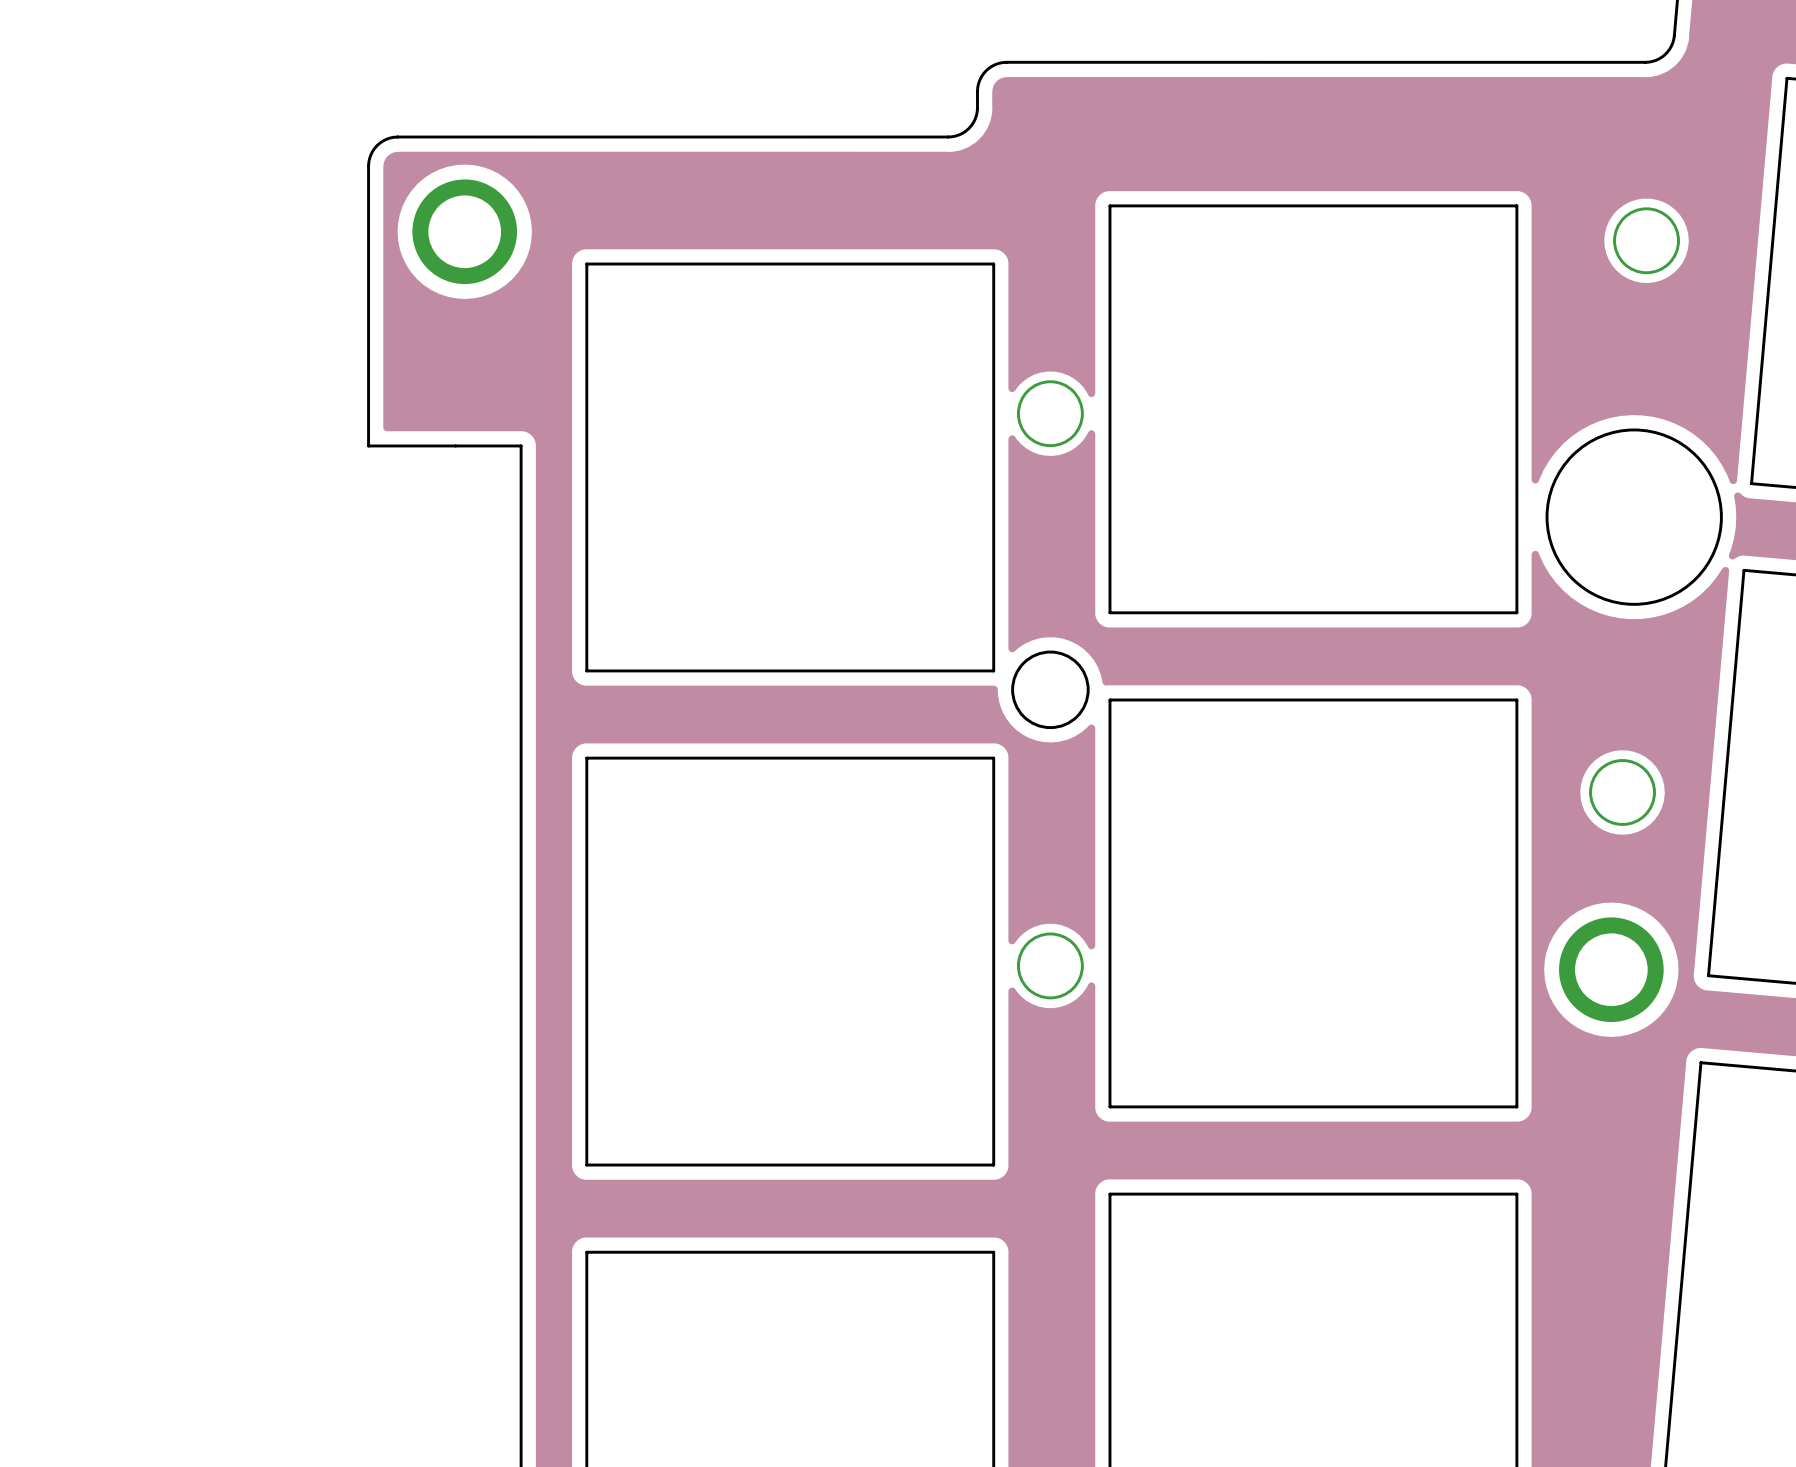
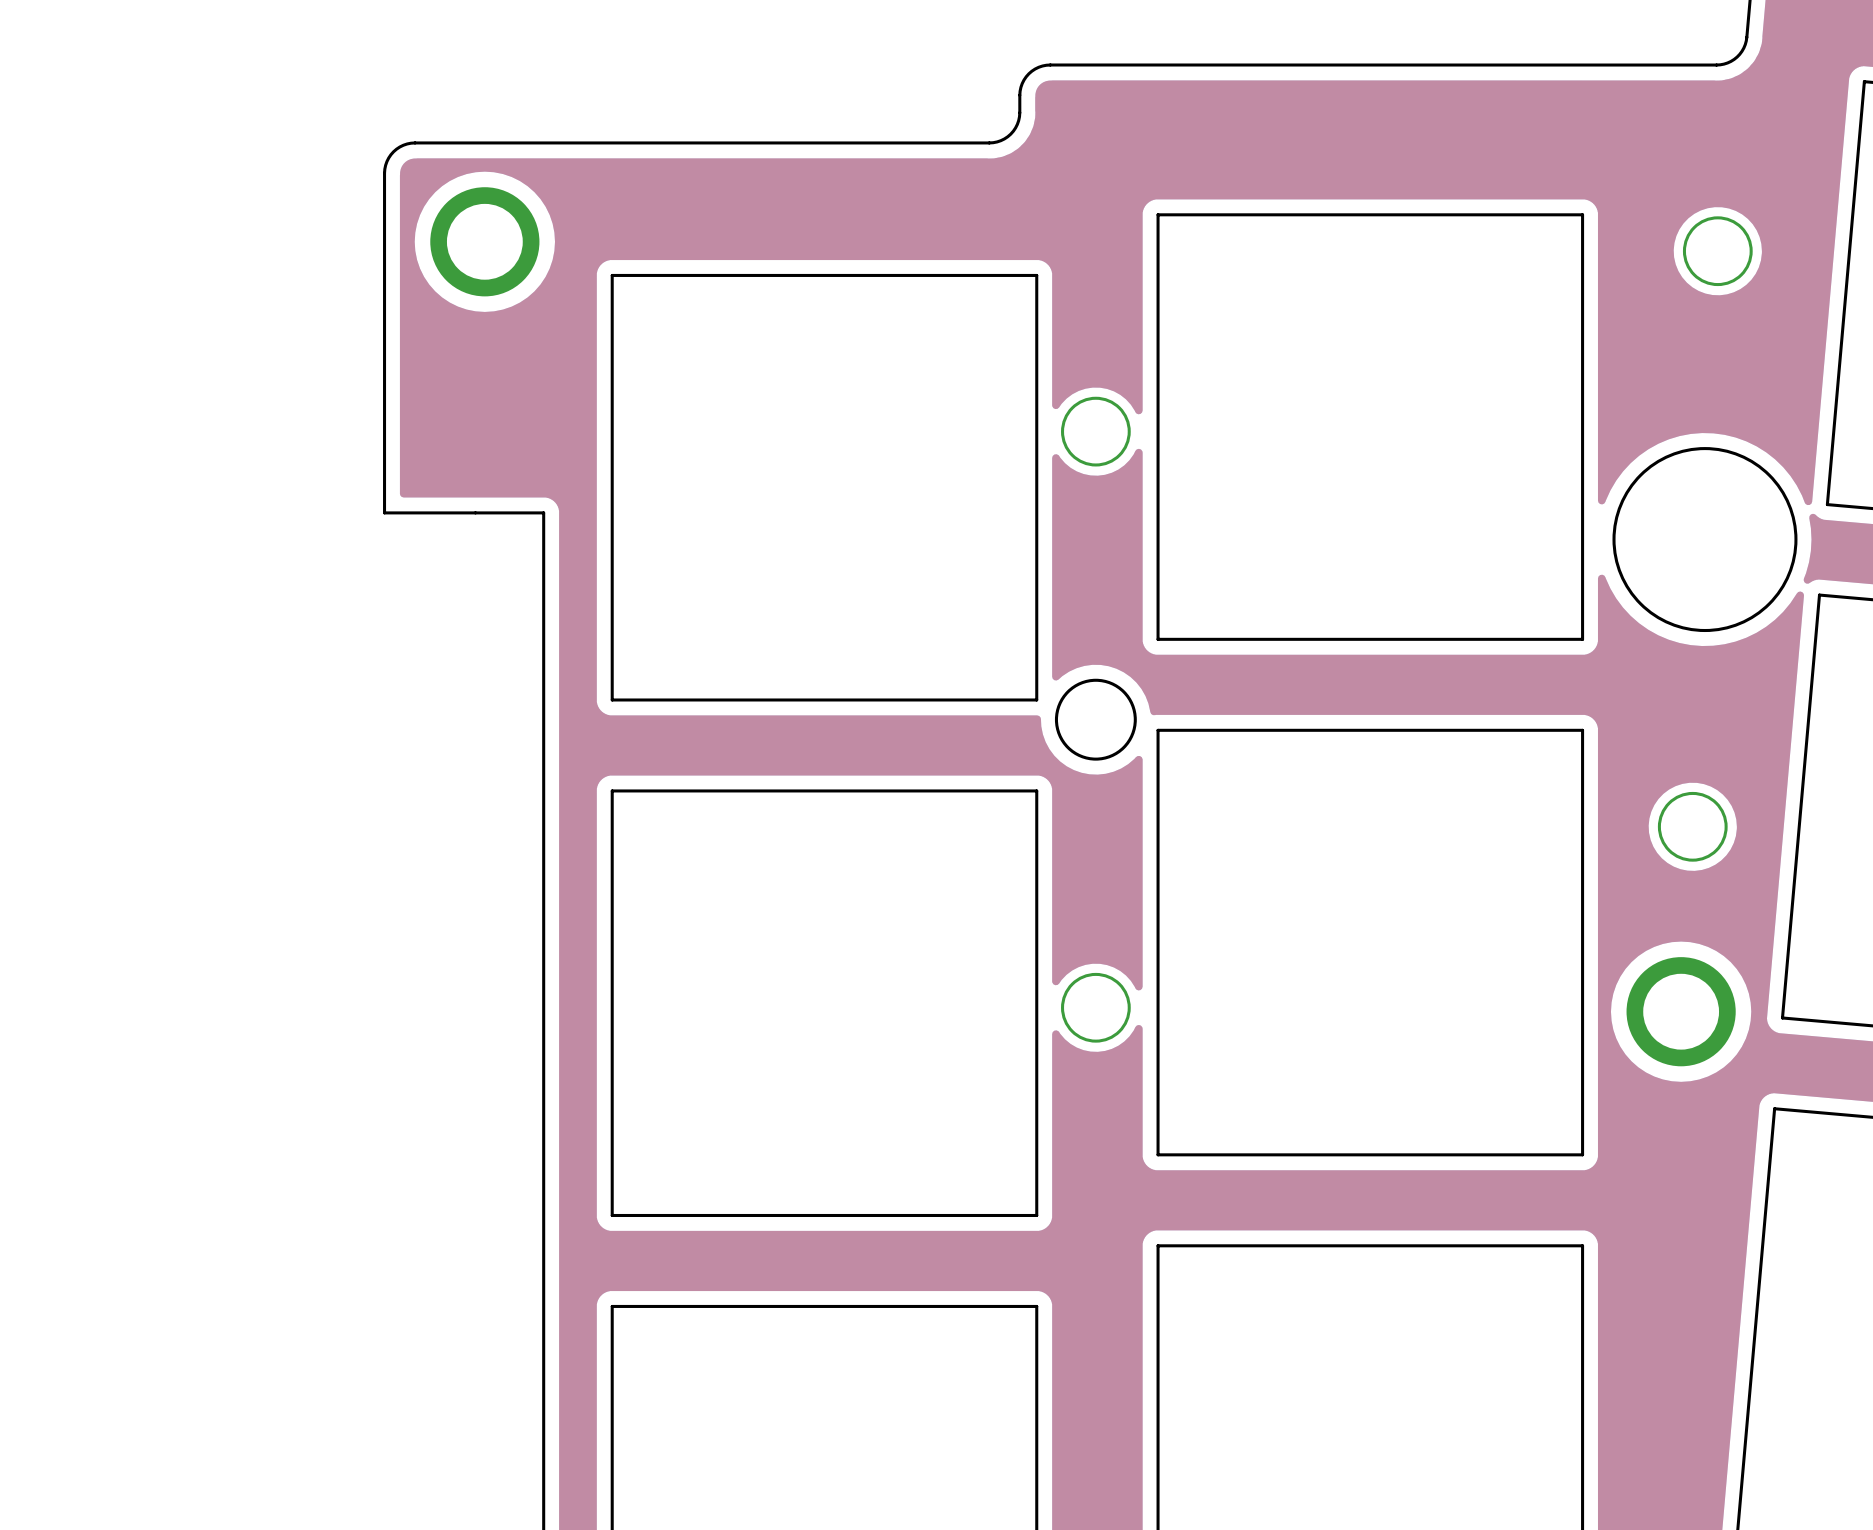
board edge: (368, 445) (521, 445) (521, 491) -> (384, 465) (384, 512) (543, 512)

